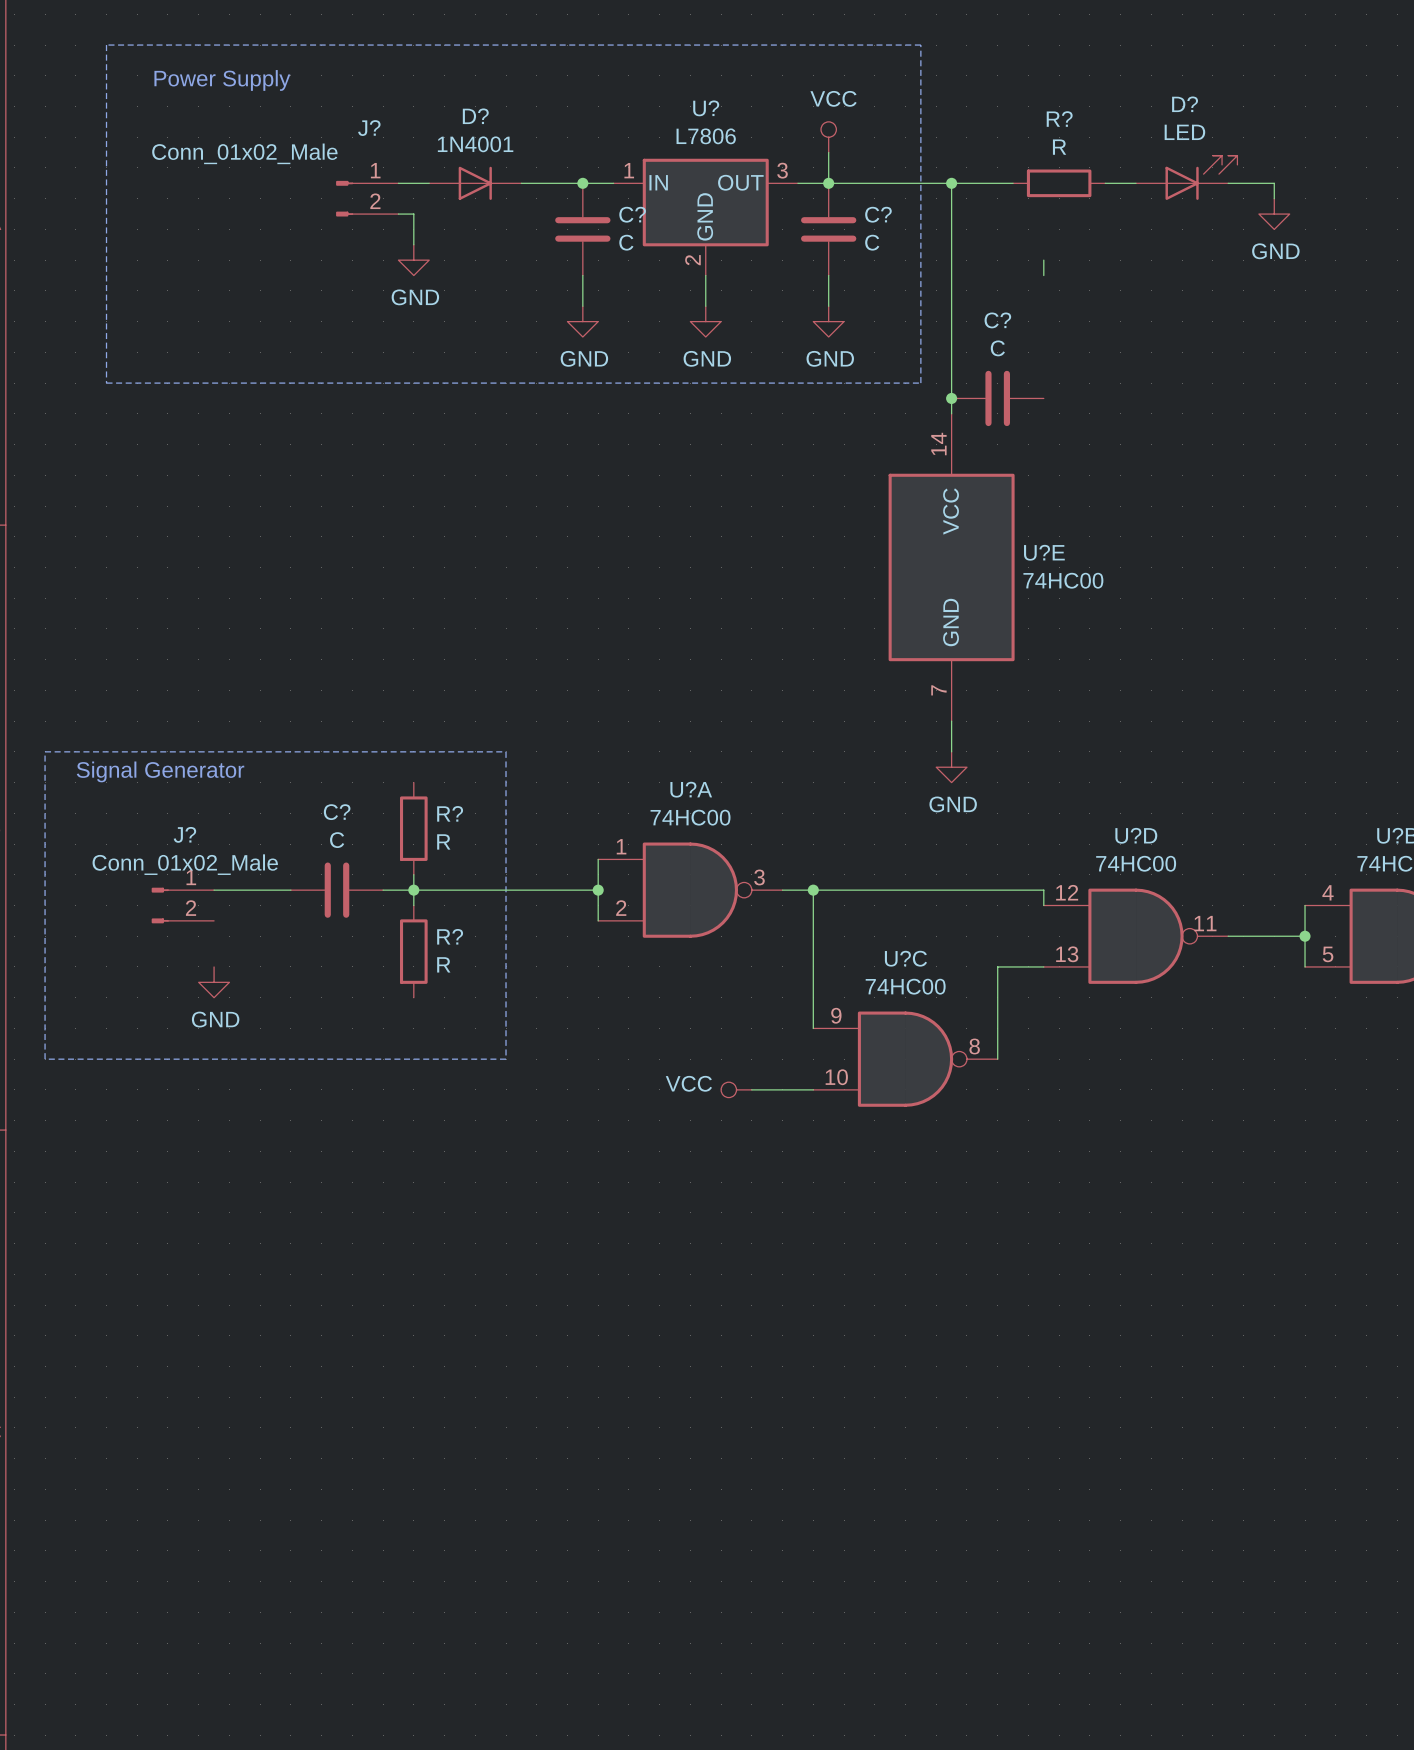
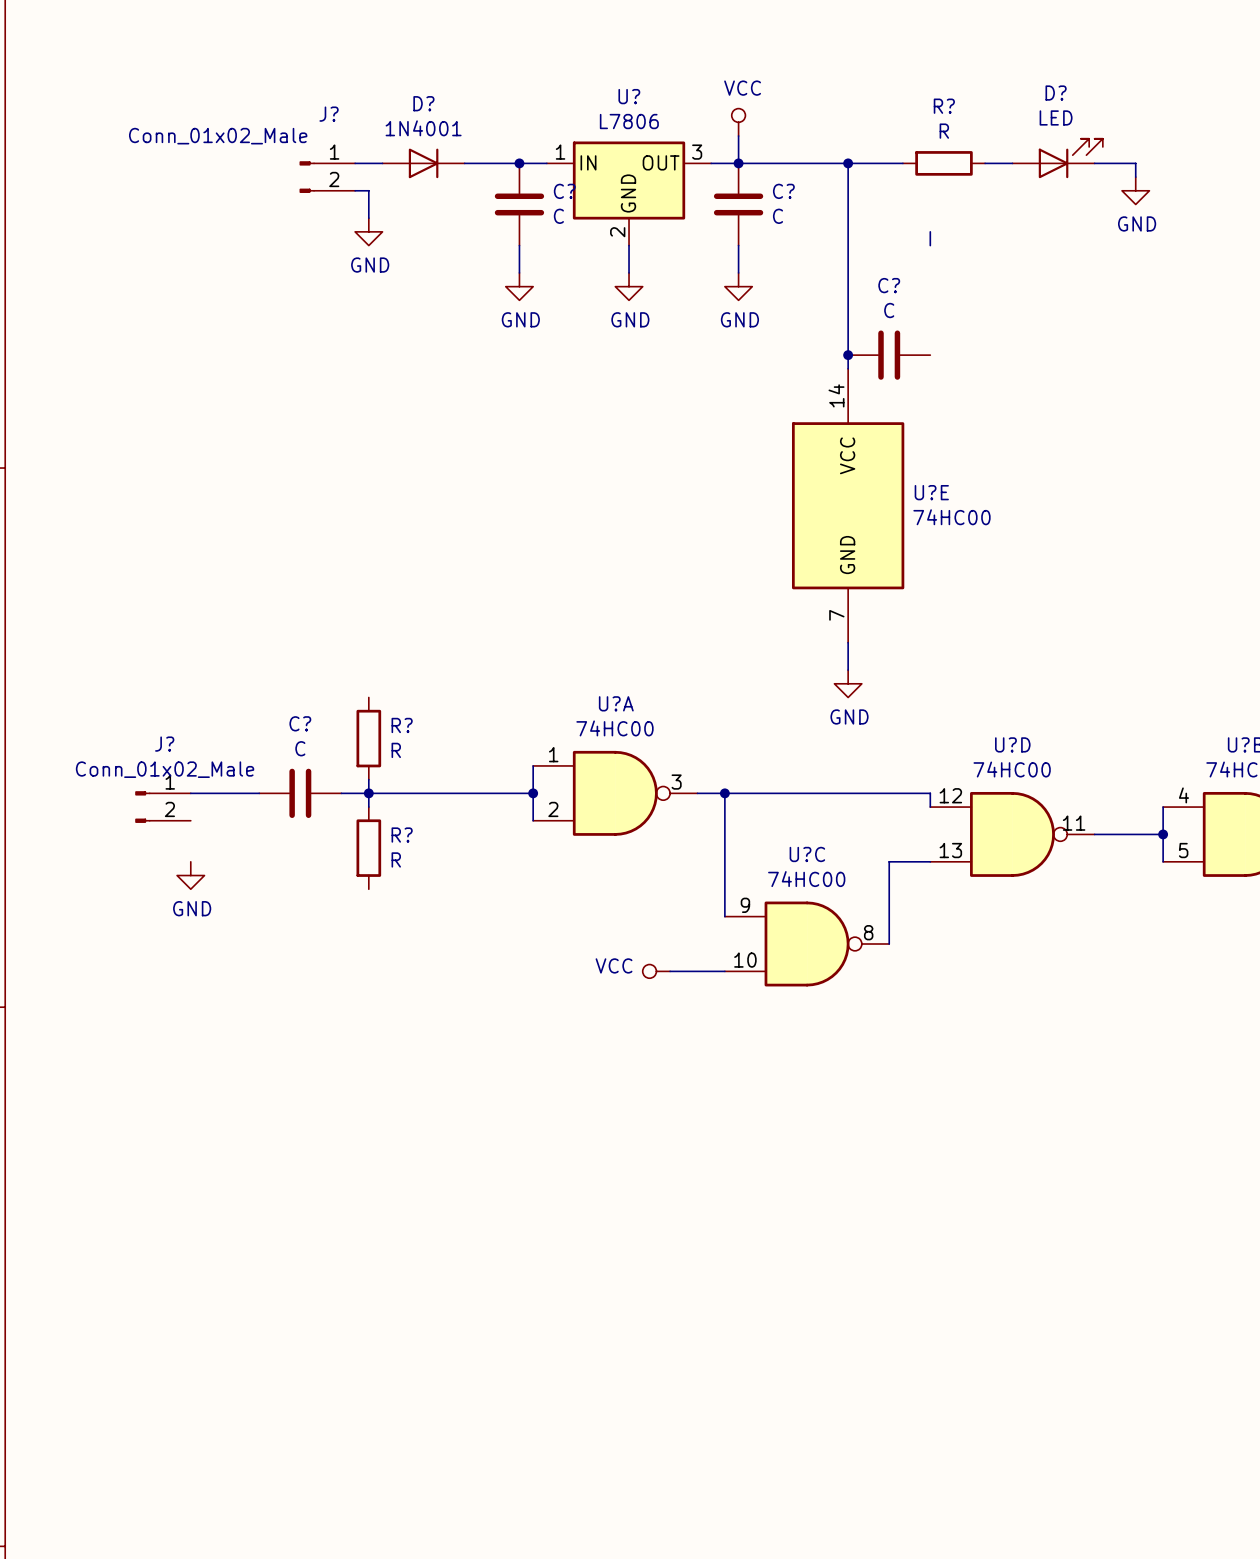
line: (106, 45) (106, 383) (920, 383) (920, 45) (106, 45) -> none
text: Power Supply (222, 80) -> none
line: (45, 751) (45, 1059) (506, 1059) (506, 751) (45, 751) -> none
text: Signal Generator (160, 771) -> none

